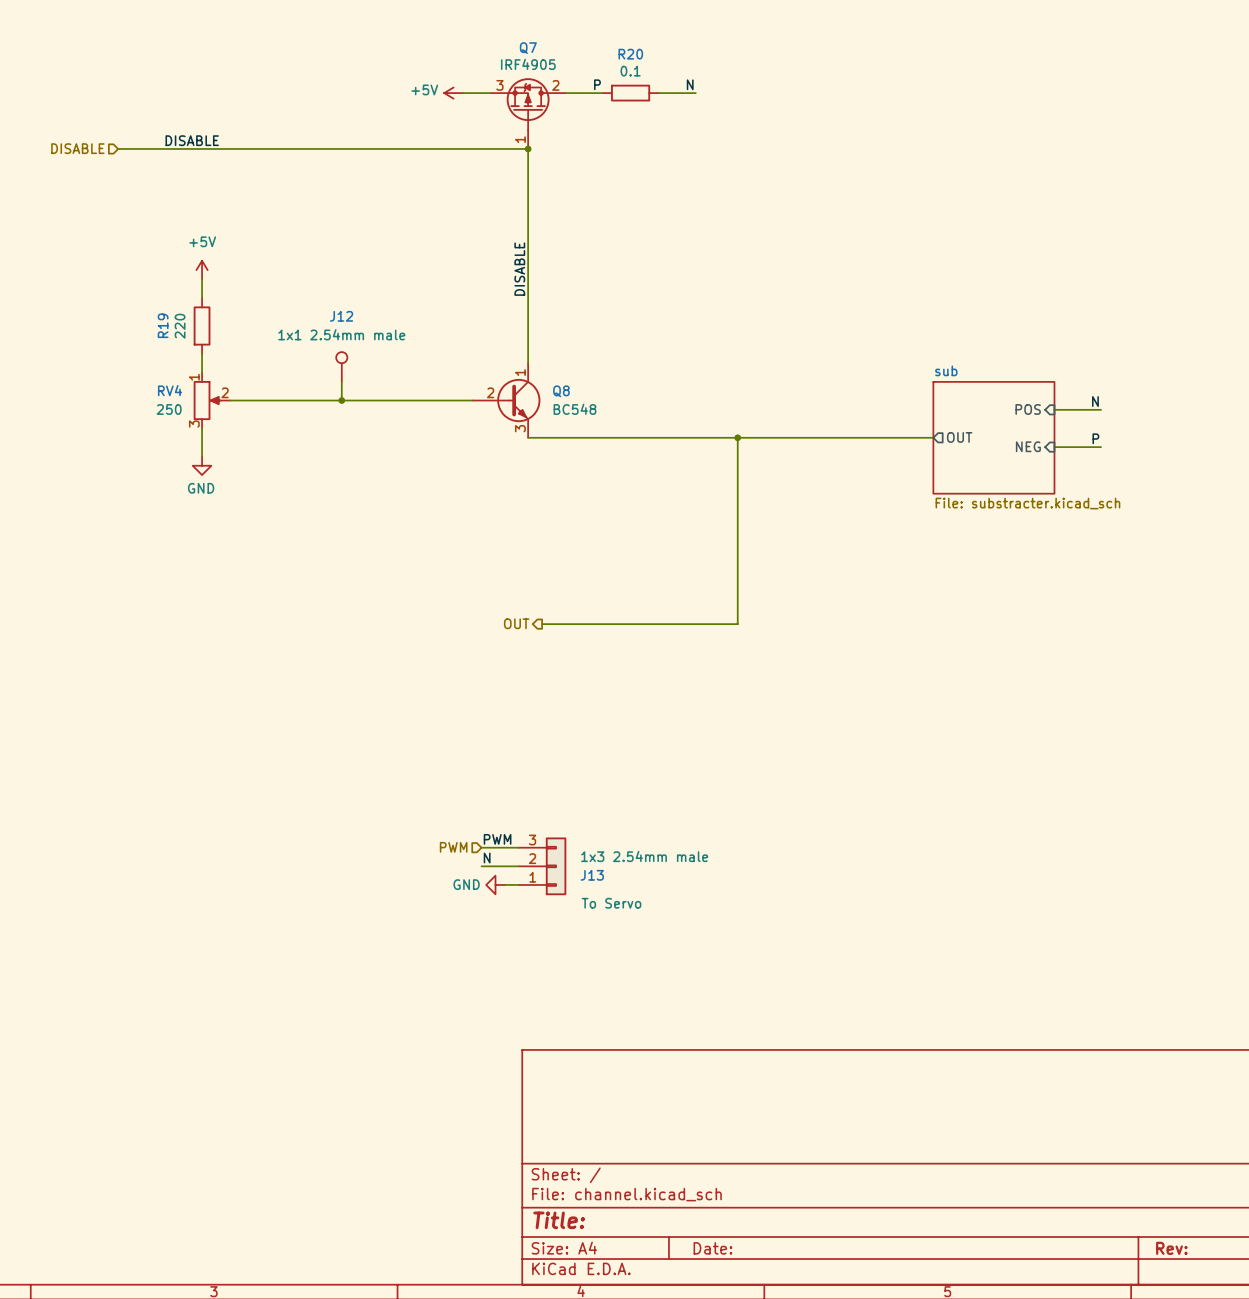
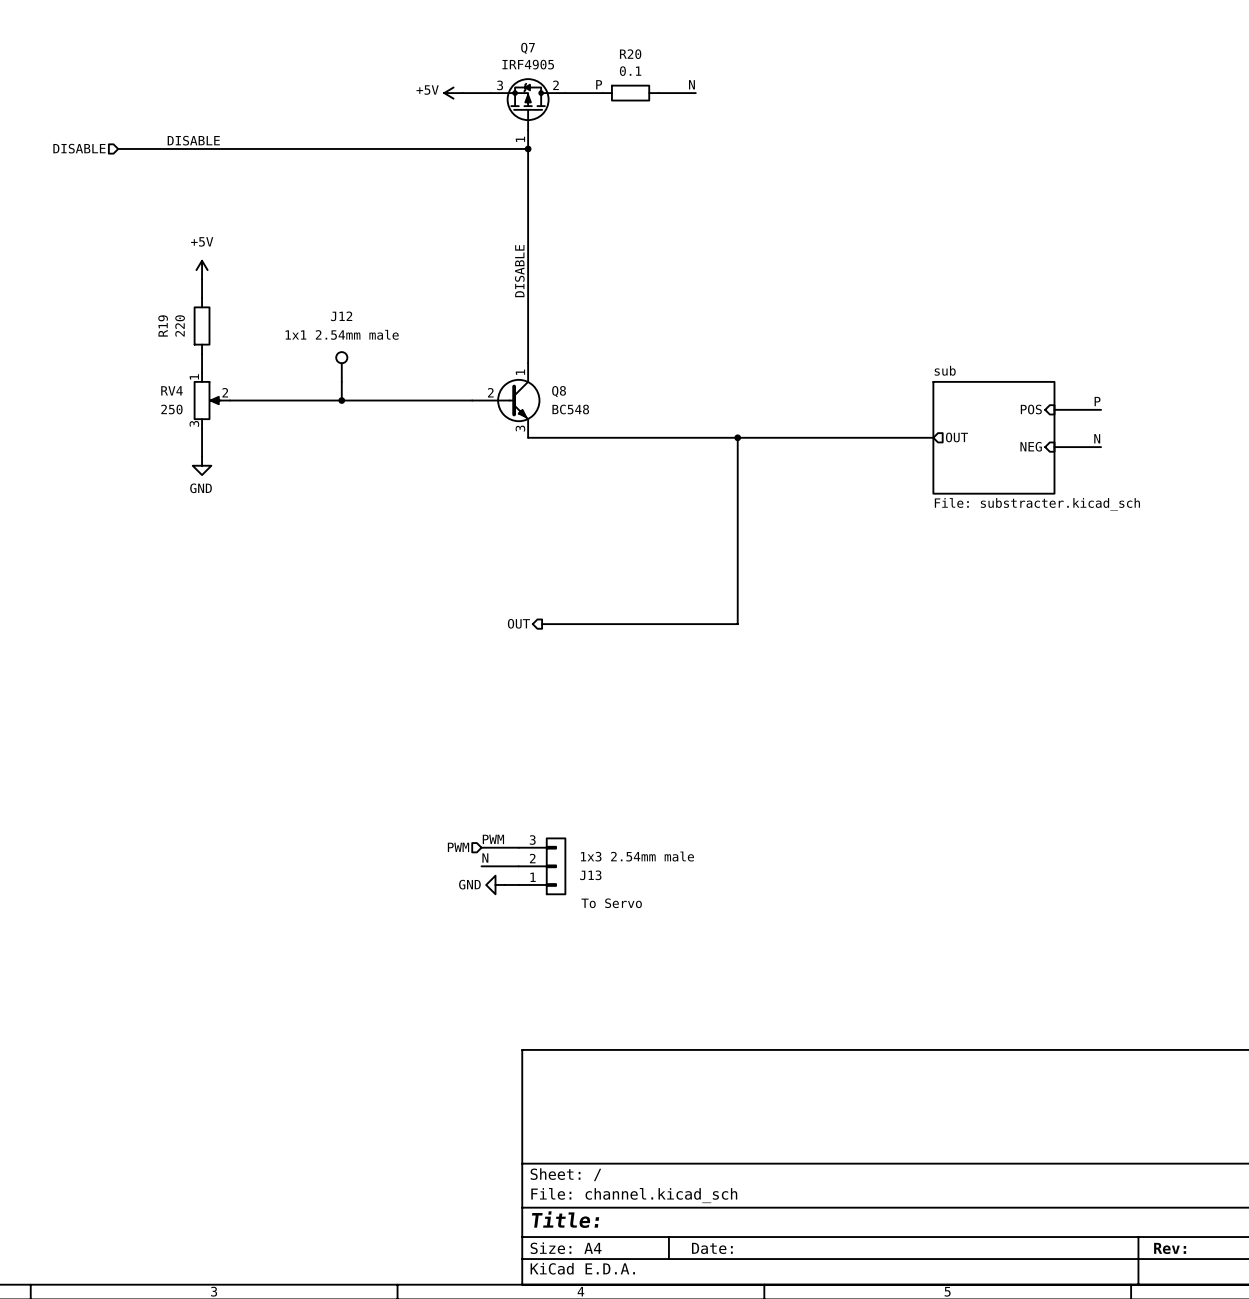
label: N (1095, 401) -> P (1097, 401)
label: P (1095, 438) -> N (1097, 438)

